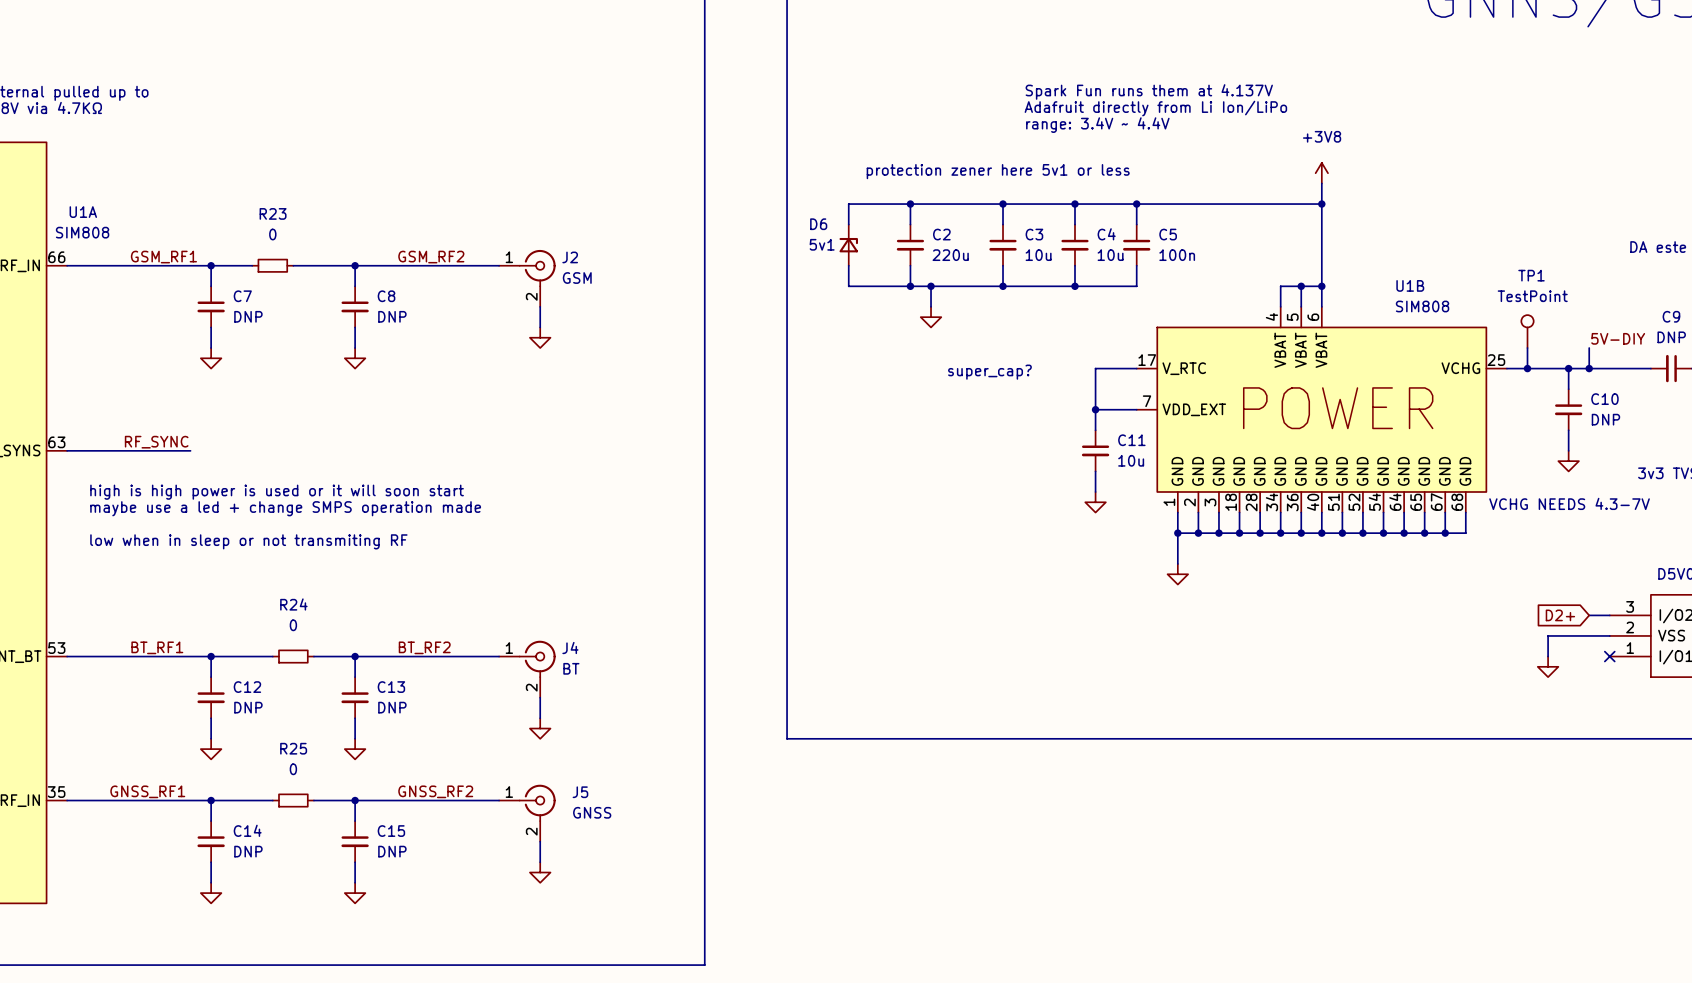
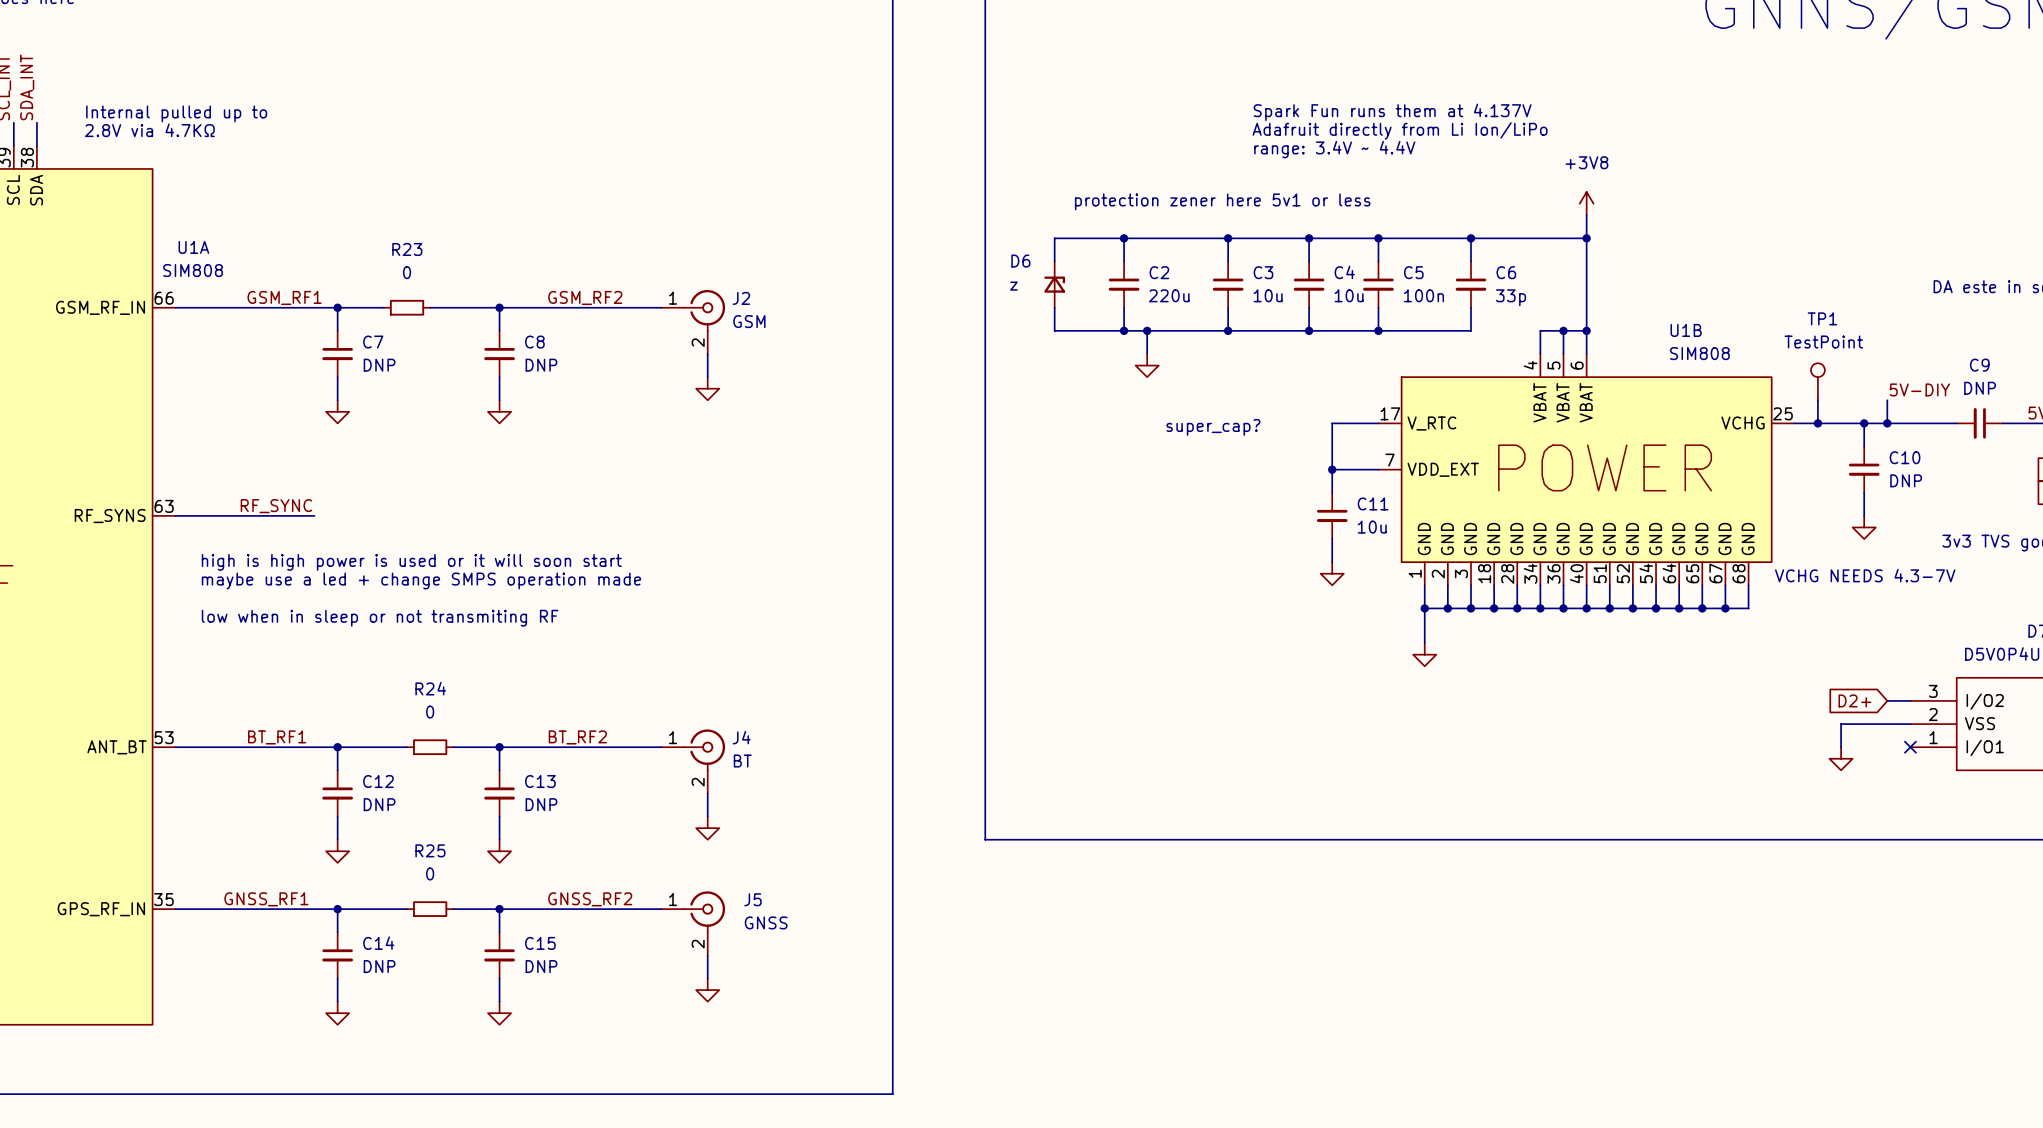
wire: none -> (1470, 238) (1470, 261)
junction: none -> (1470, 238)
D6 value: 5v1 (822, 244) -> z (1013, 286)
C6: none -> 33p (1470, 284)
wire: none -> (1470, 307) (1470, 330) (1378, 330)
junction: none -> (1378, 330)

